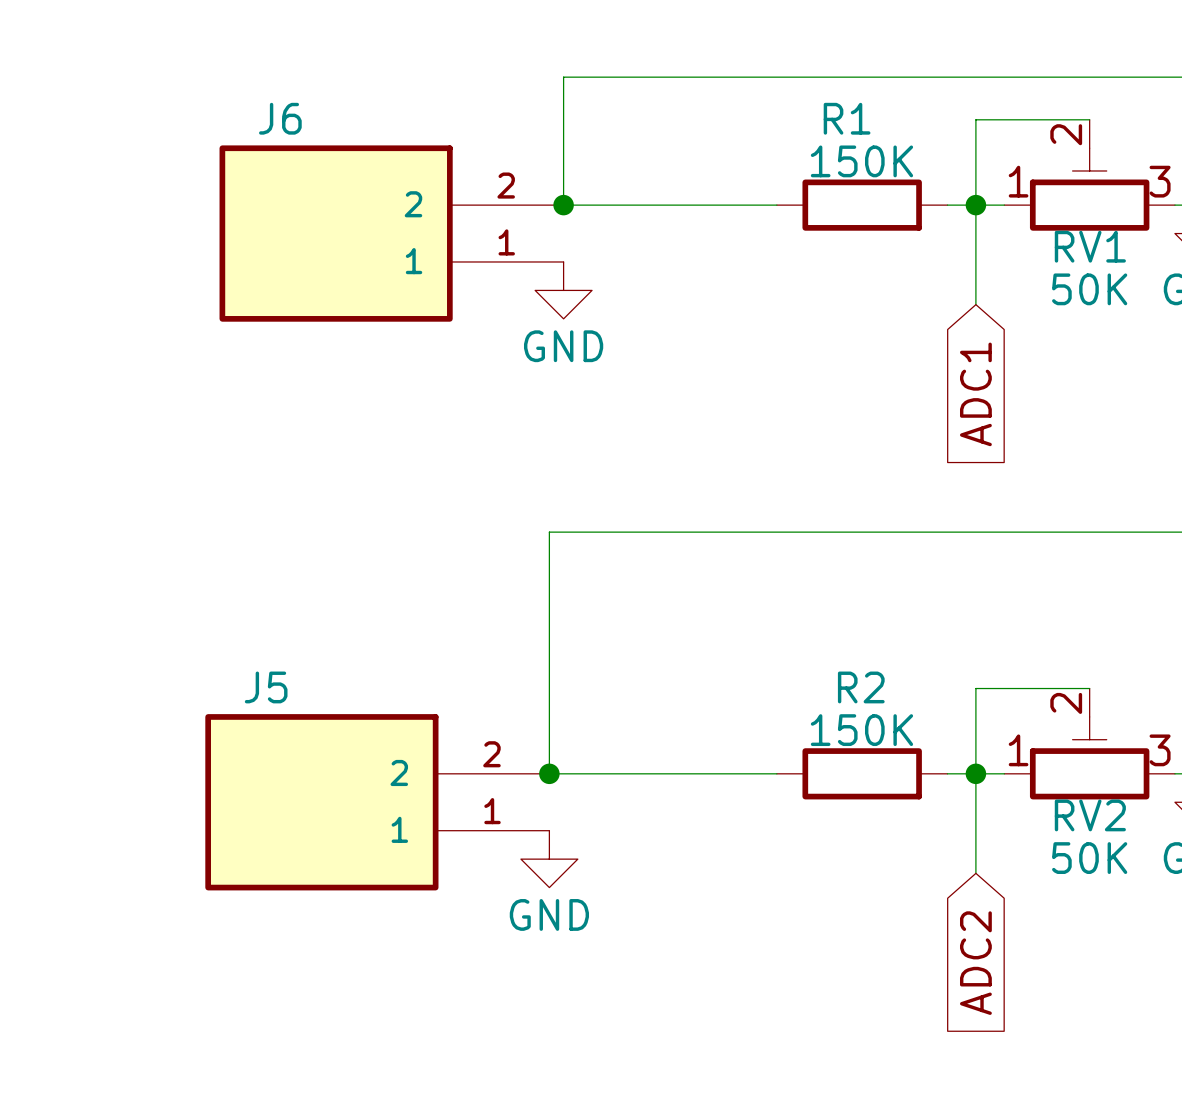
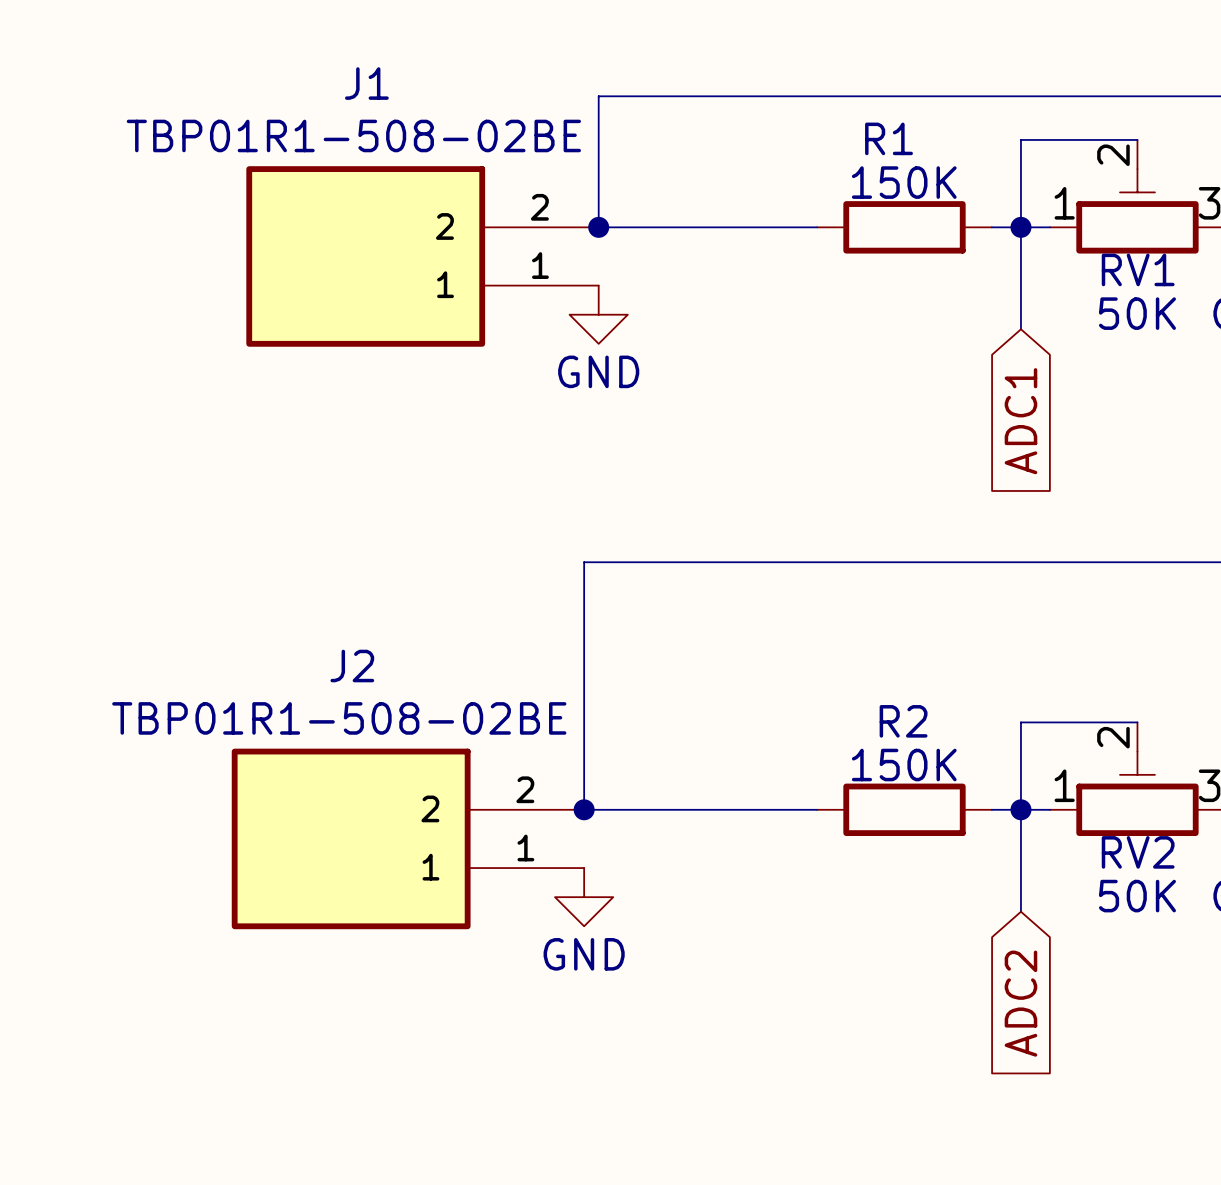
J6 value: none -> TBP01R1-508-02BE (353, 135)
J6 name: J6 (280, 118) -> J1 (366, 83)
J5 value: none -> TBP01R1-508-02BE (339, 718)
J5 name: J5 (266, 687) -> J2 (352, 666)

